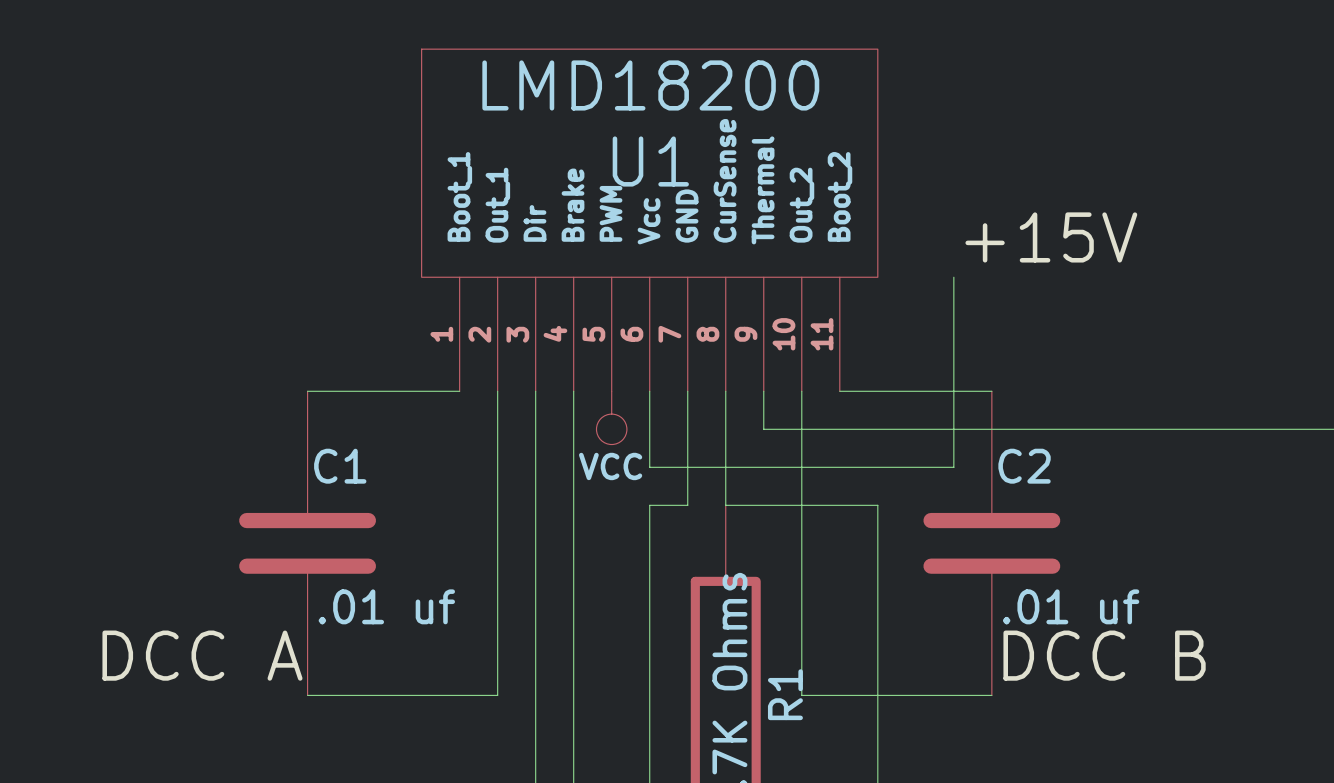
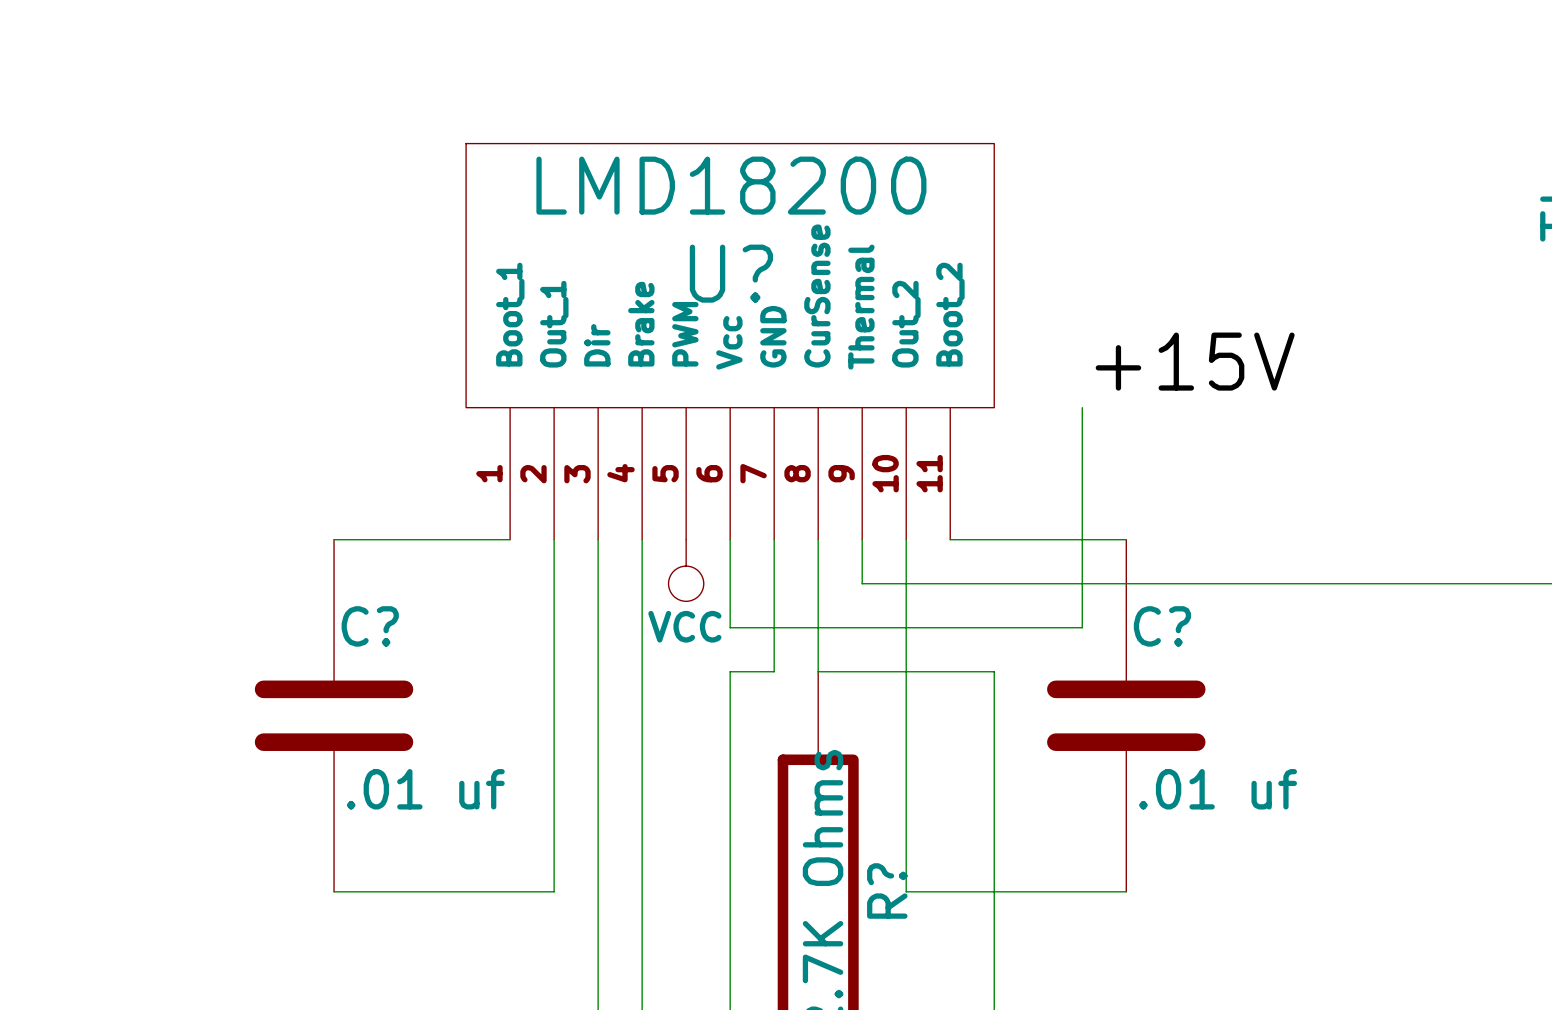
U1 name: U1 (650, 161) -> U? (731, 273)
C1 name: C1 (340, 466) -> C? (370, 626)
C2 name: C2 (1024, 466) -> C? (1162, 626)
label: DCC A (202, 655) -> none
label: DCC B (1104, 655) -> none
R1 name: R1 (785, 694) -> R? (887, 890)

